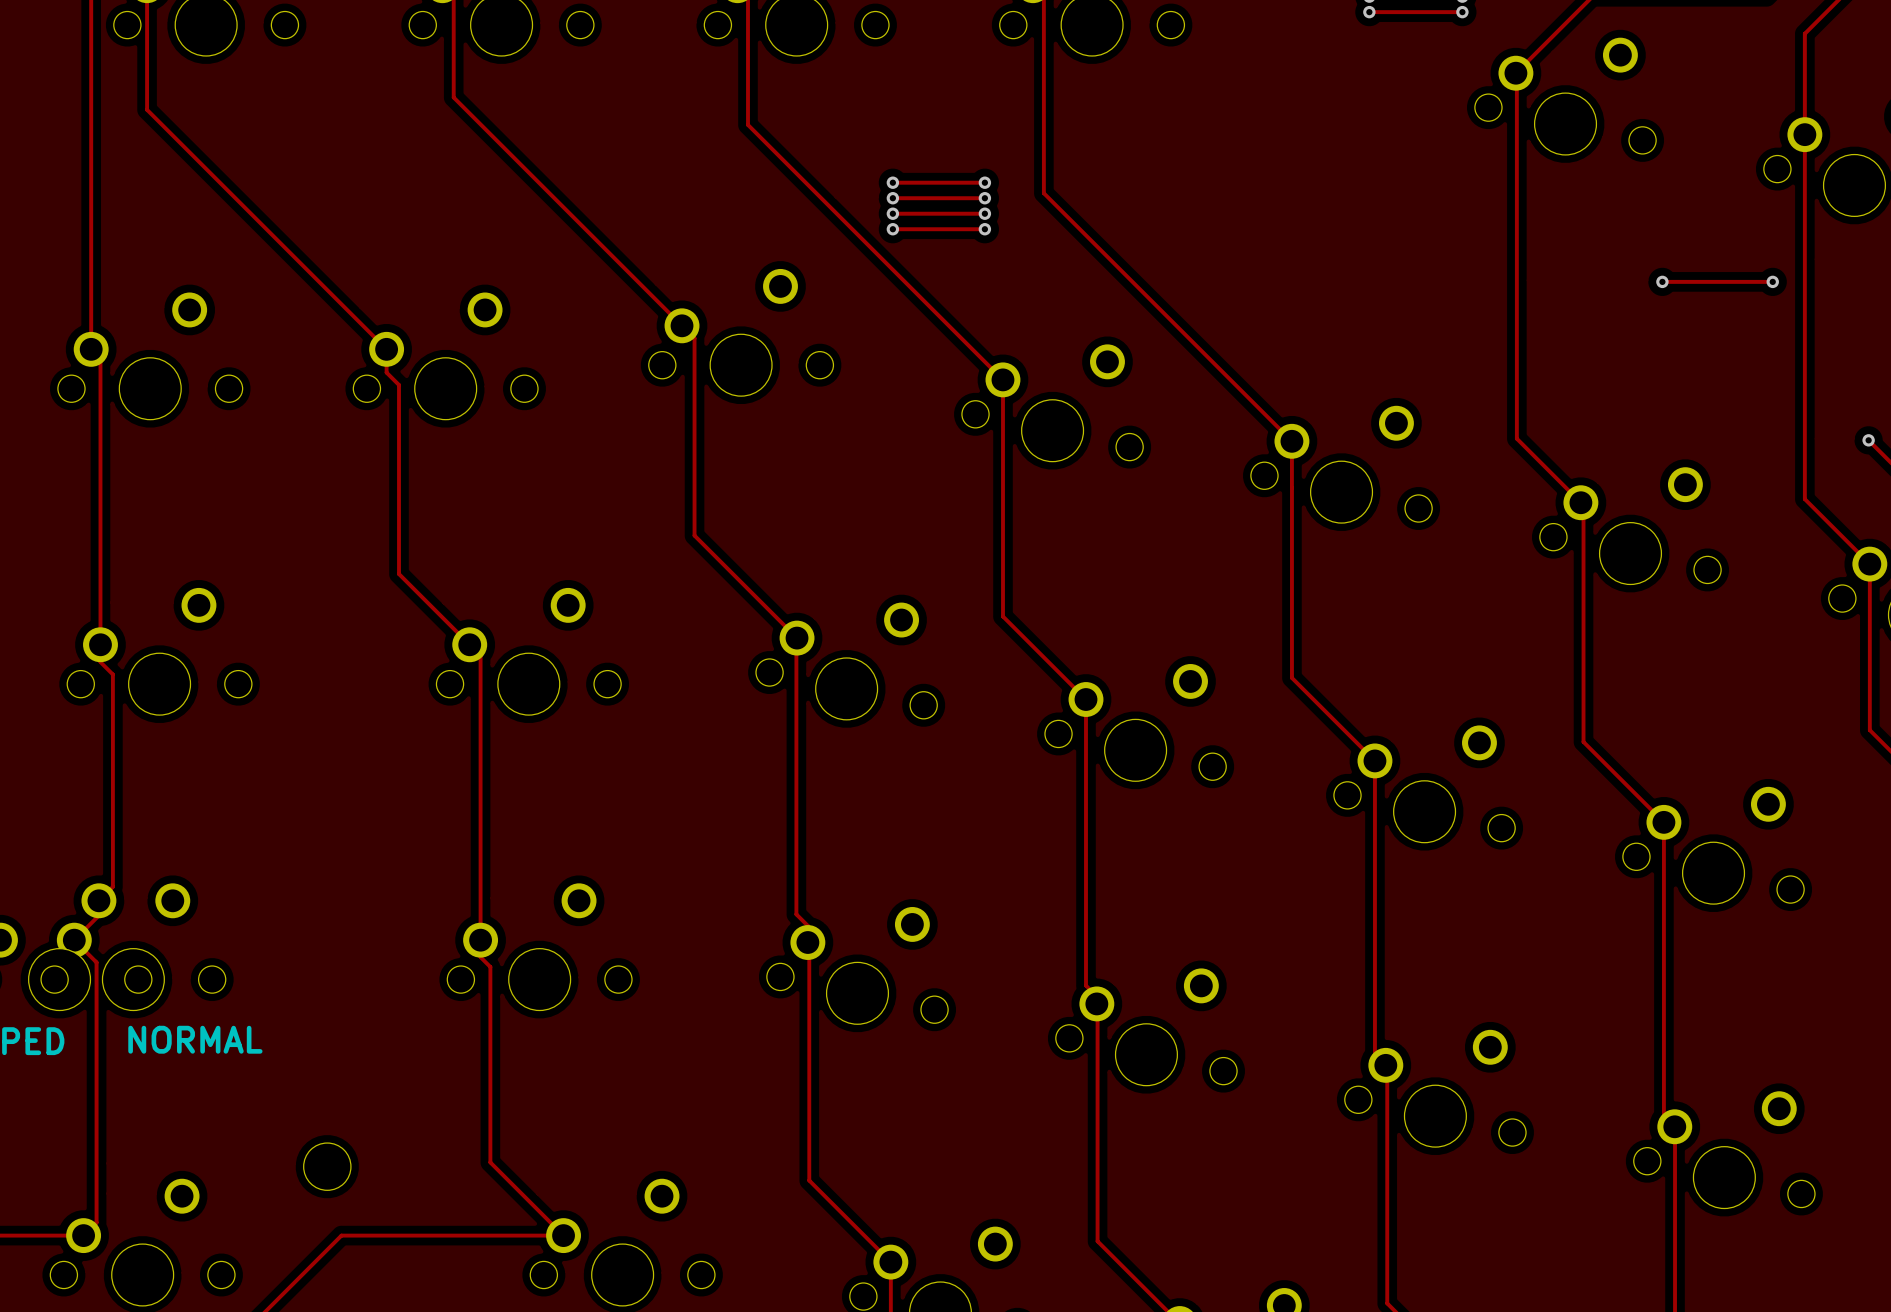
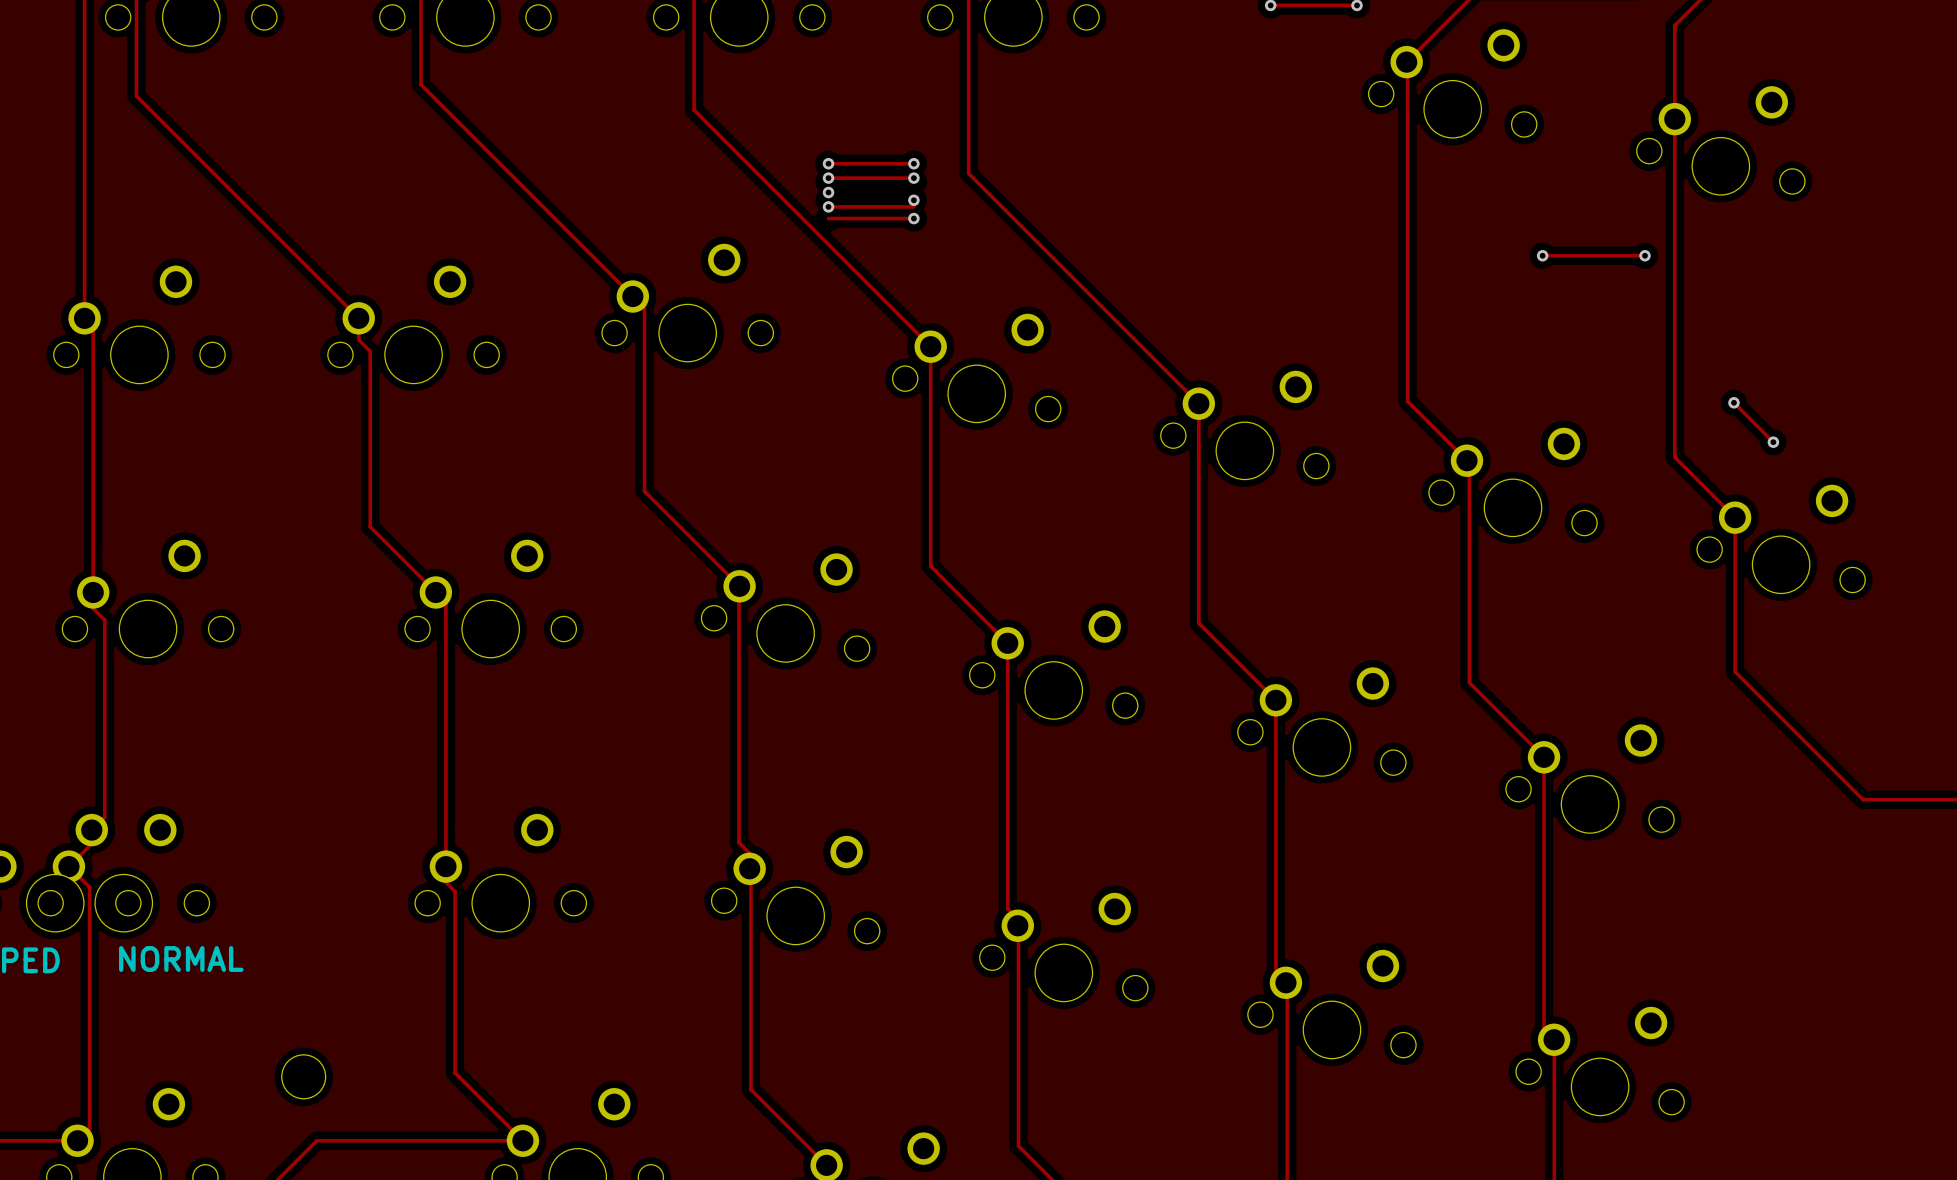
track: (892, 213) (984, 213) -> (828, 218) (913, 218)
via: (984, 213) -> none
via: none -> (913, 200)
via: (984, 229) -> none
via: none -> (913, 218)

